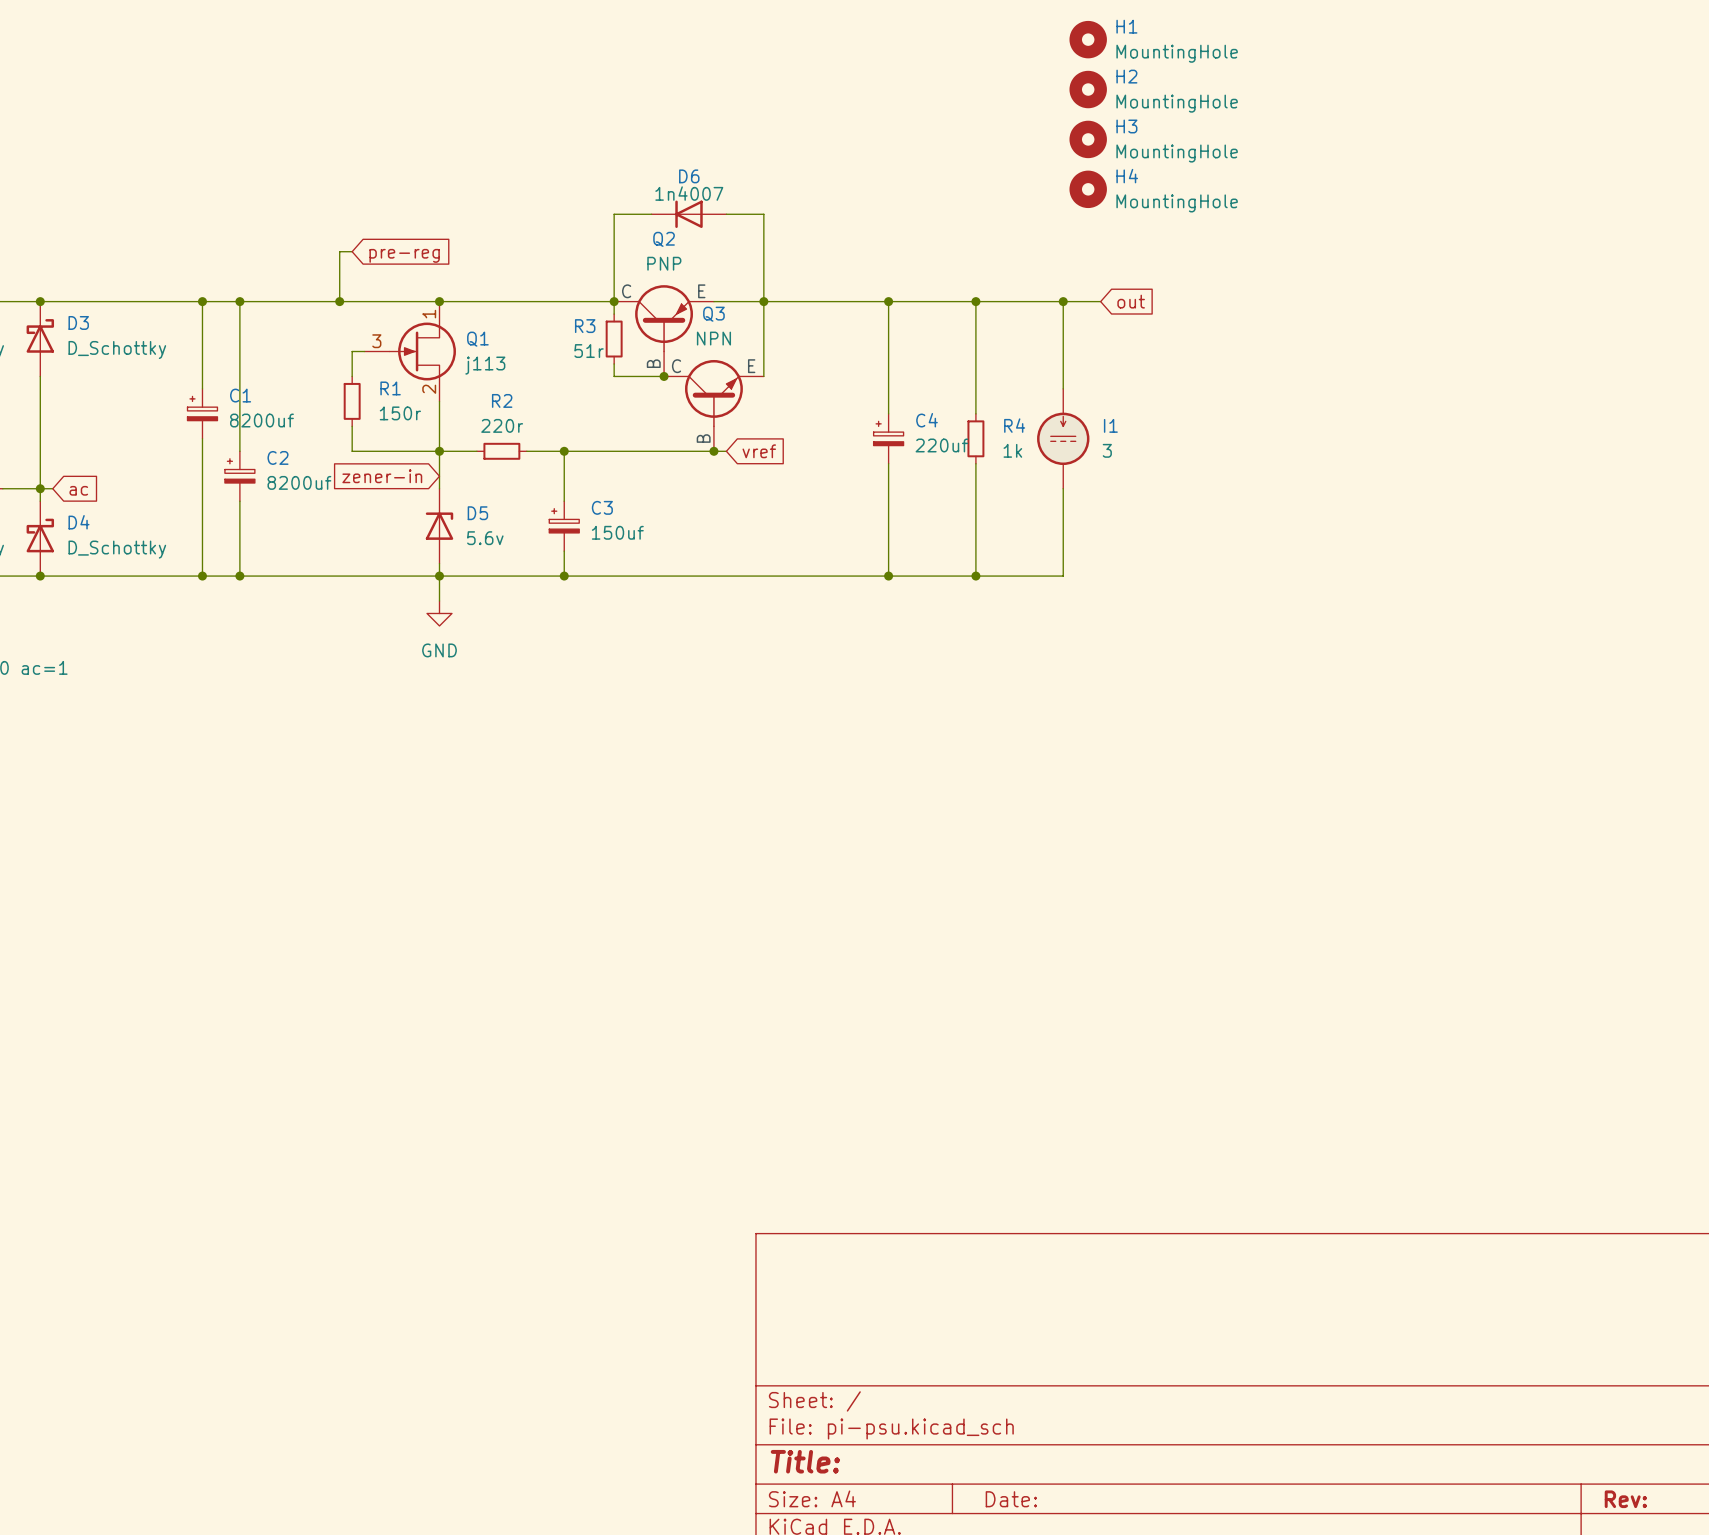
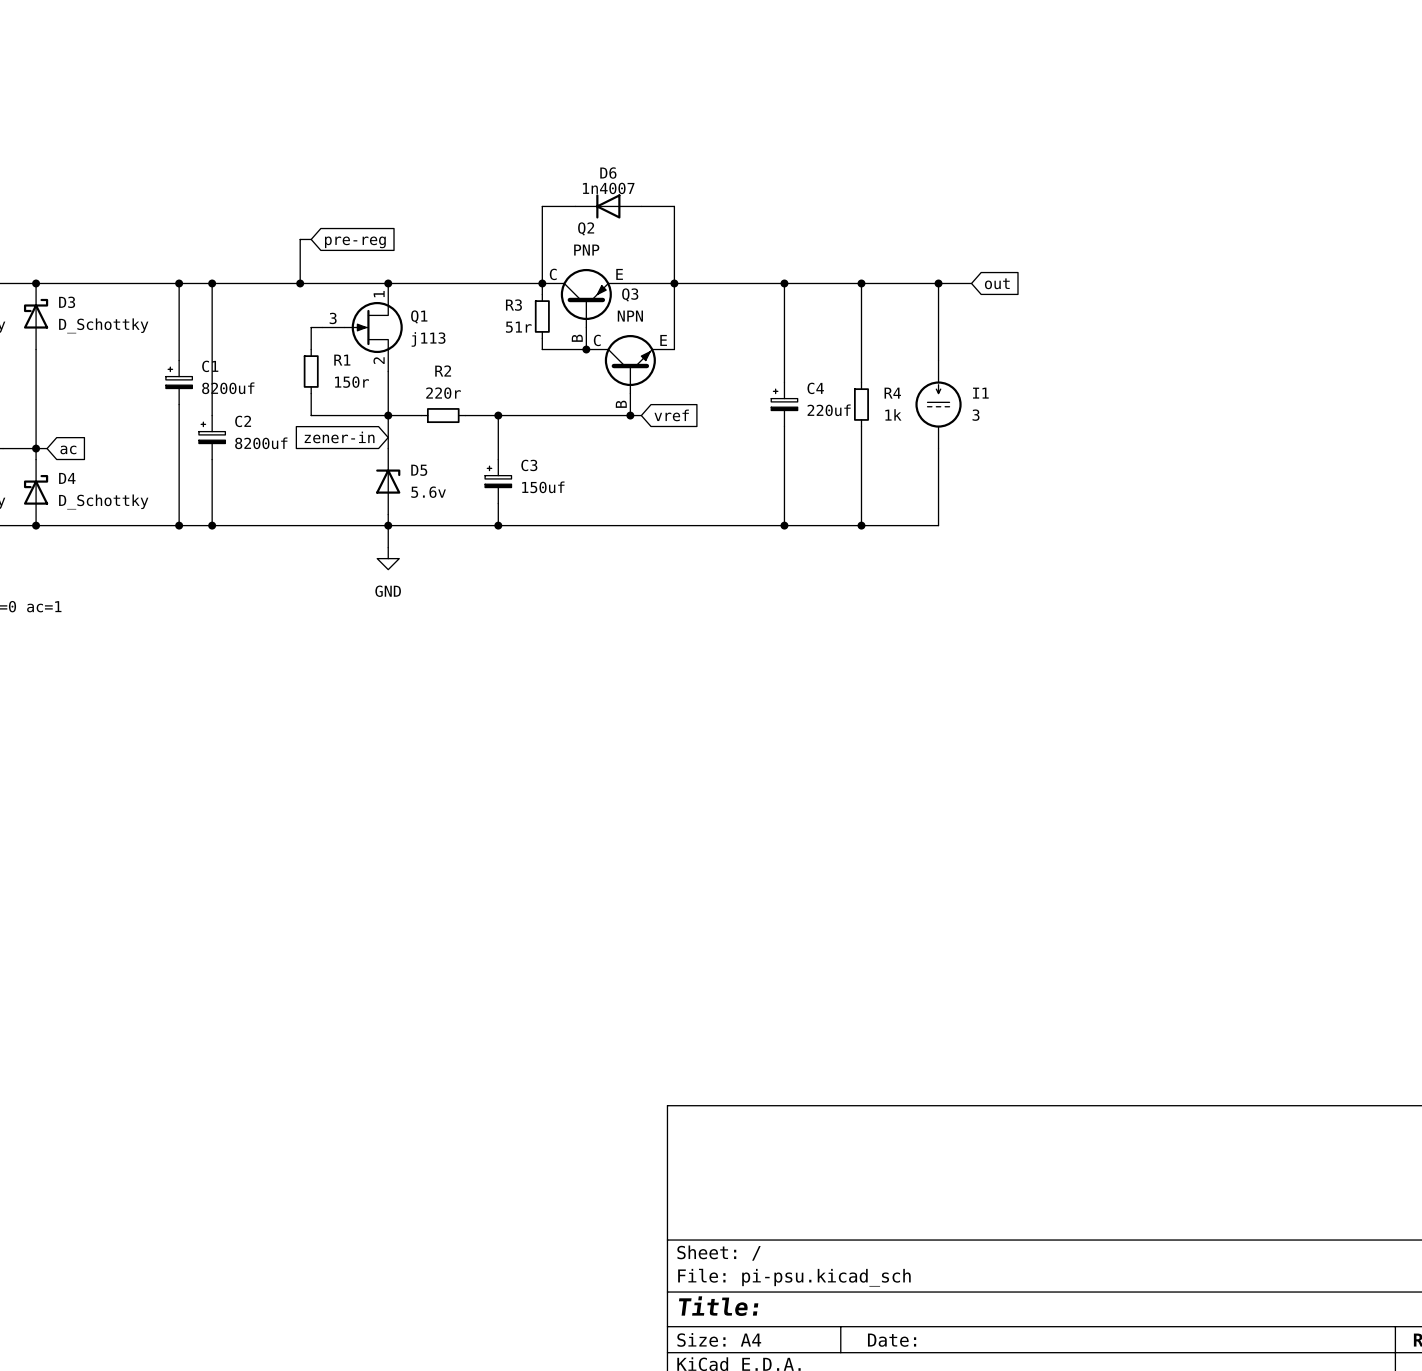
H1: MountingHole (1088, 39) -> none
H2: MountingHole (1088, 89) -> none
H3: MountingHole (1088, 139) -> none
H4: MountingHole (1088, 189) -> none

